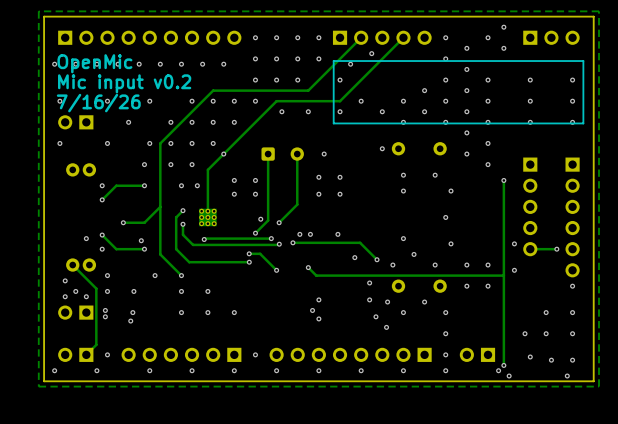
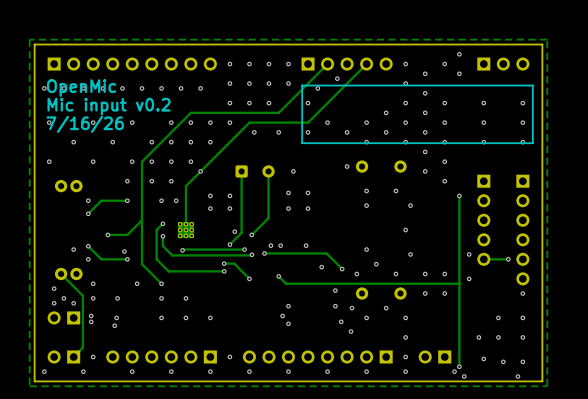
part: (75, 122) -> none

